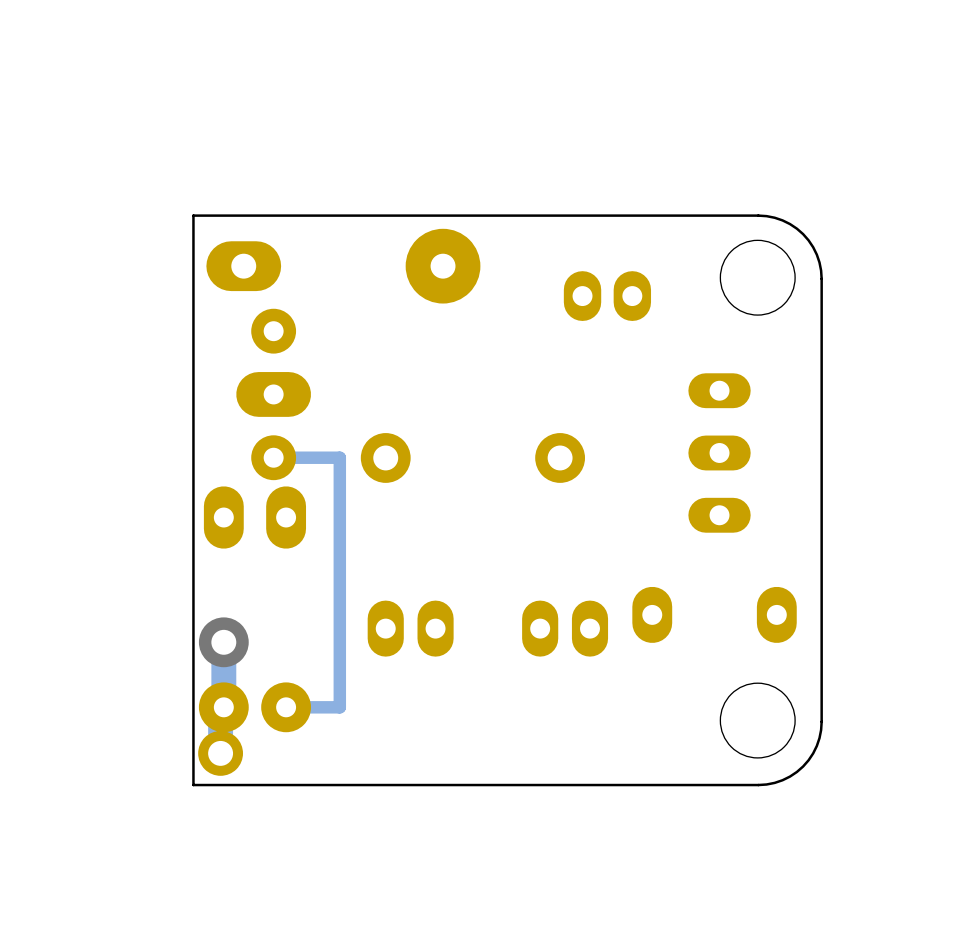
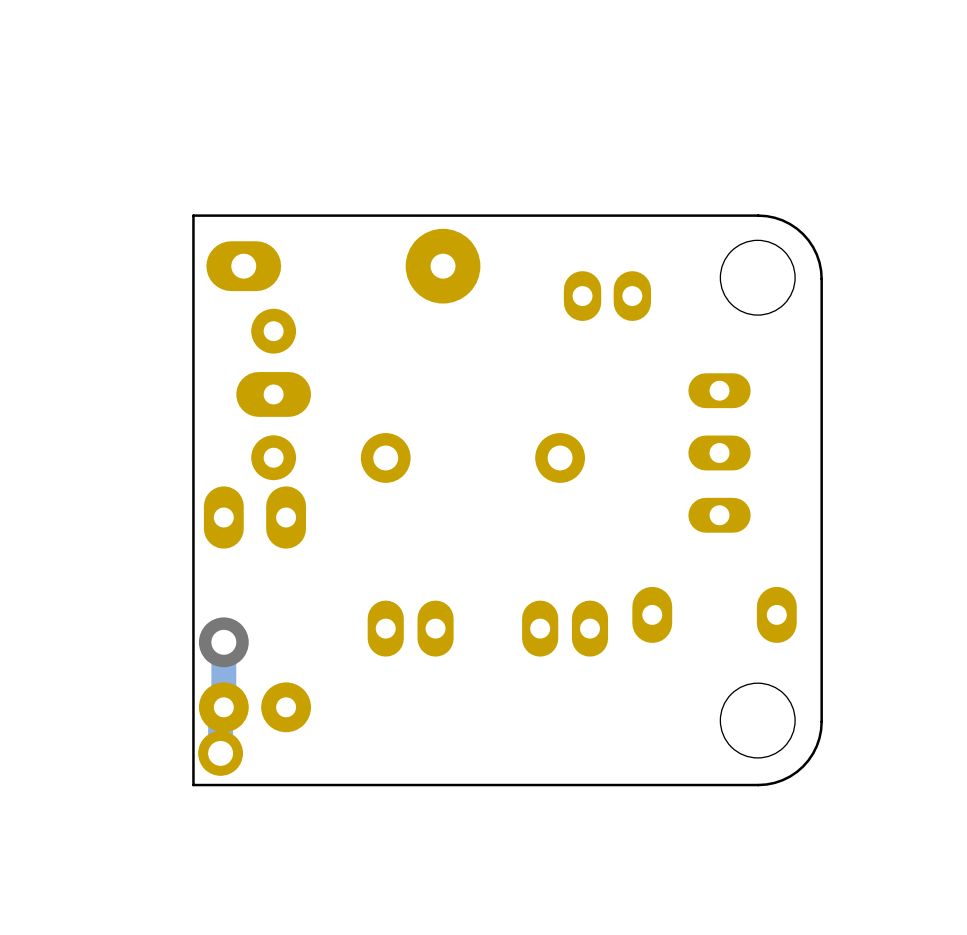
track: (273, 457) (339, 457) (339, 707) (286, 707) -> none

